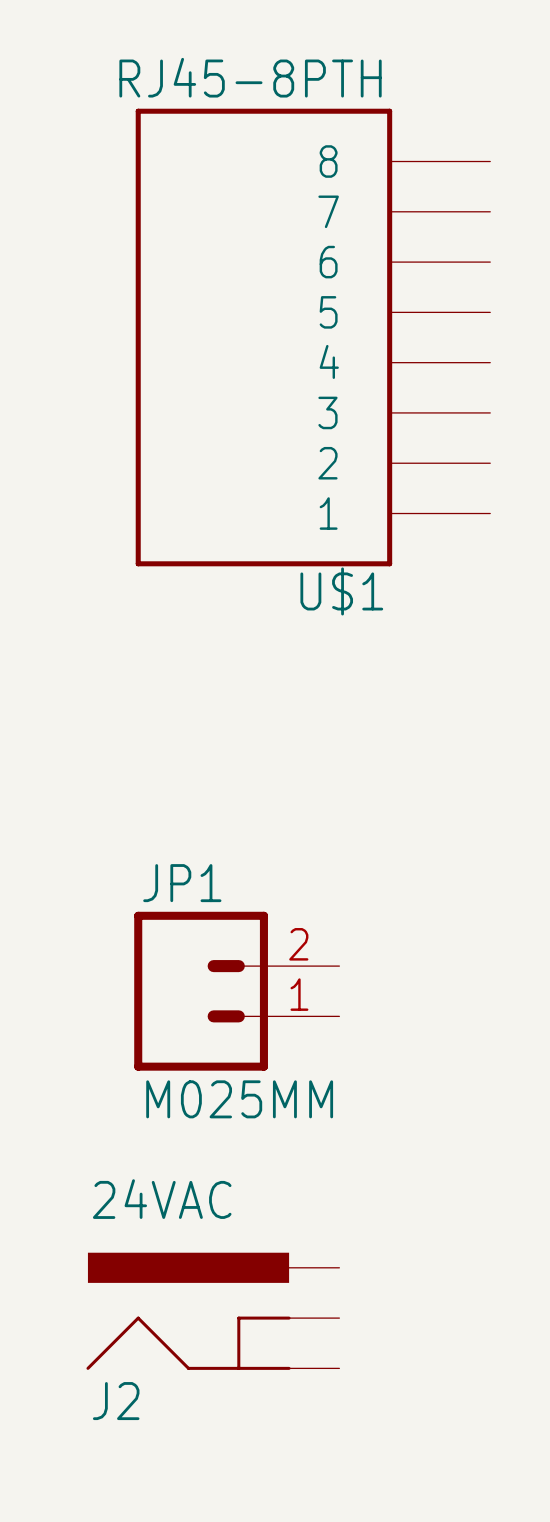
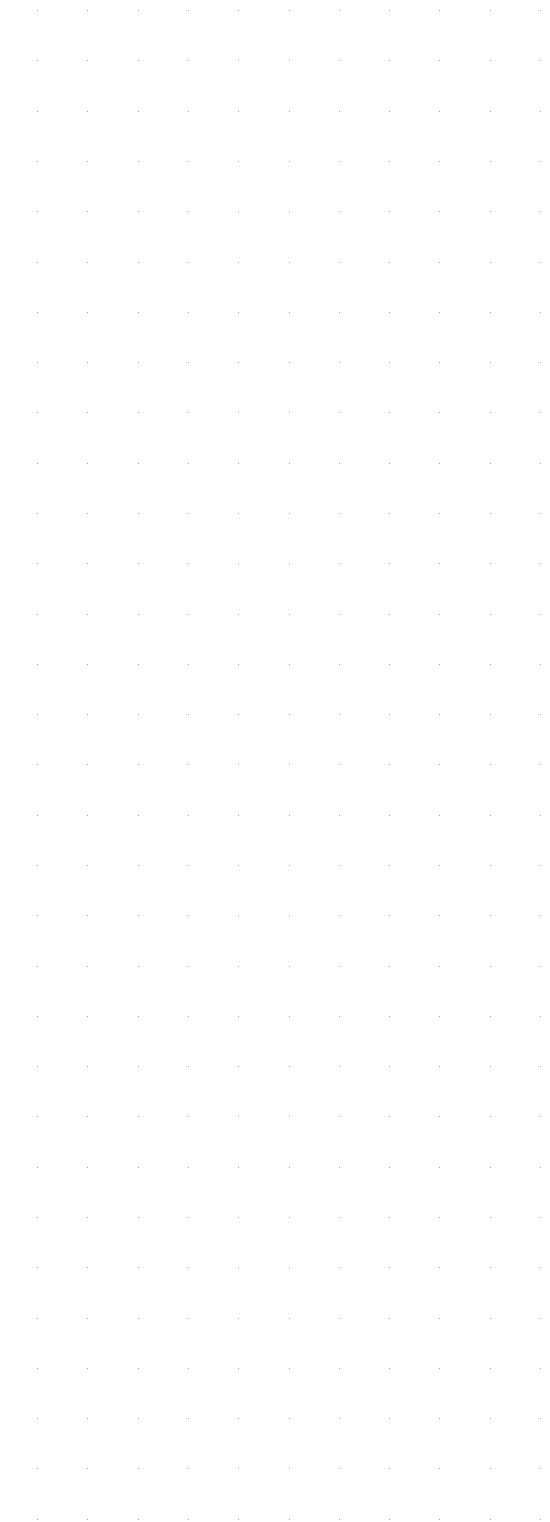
U$1: RJ45-8PTH (312, 337) -> none
JP1: M025MM (236, 991) -> none
J2: 24VAC (212, 1311) -> none

